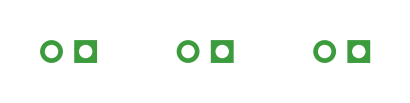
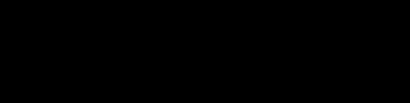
part: (68, 51) -> none
part: (205, 51) -> none
part: (341, 51) -> none

